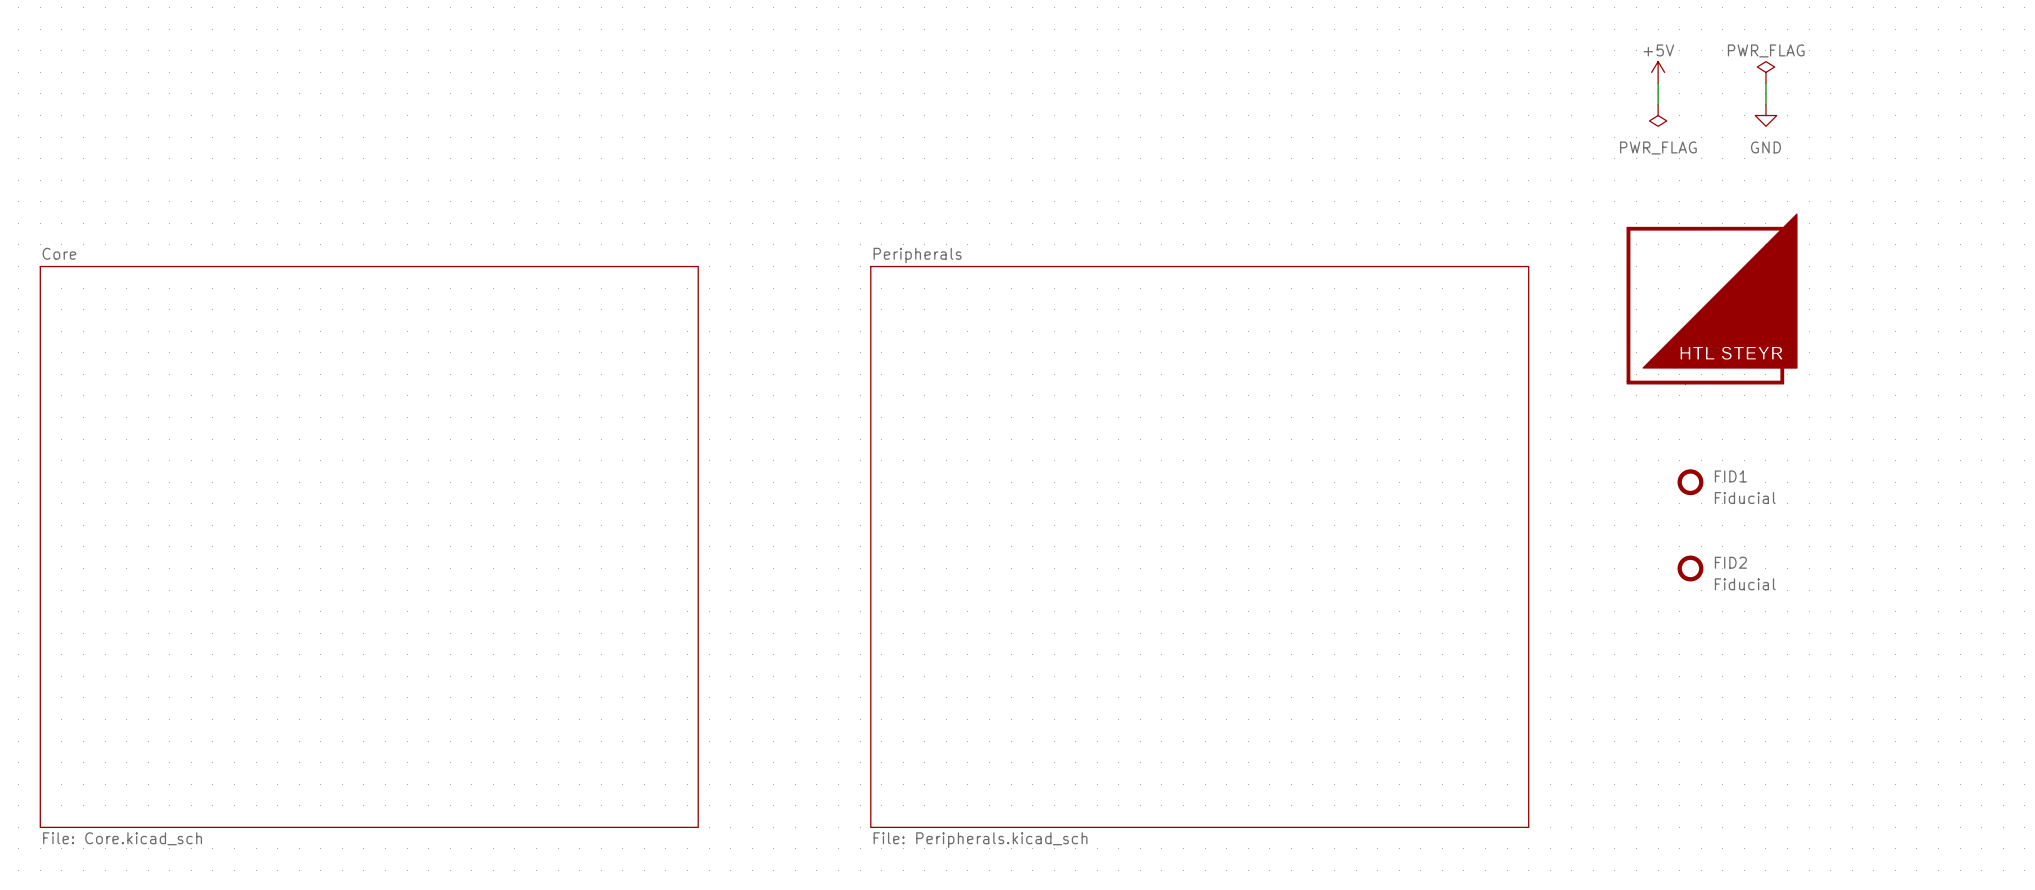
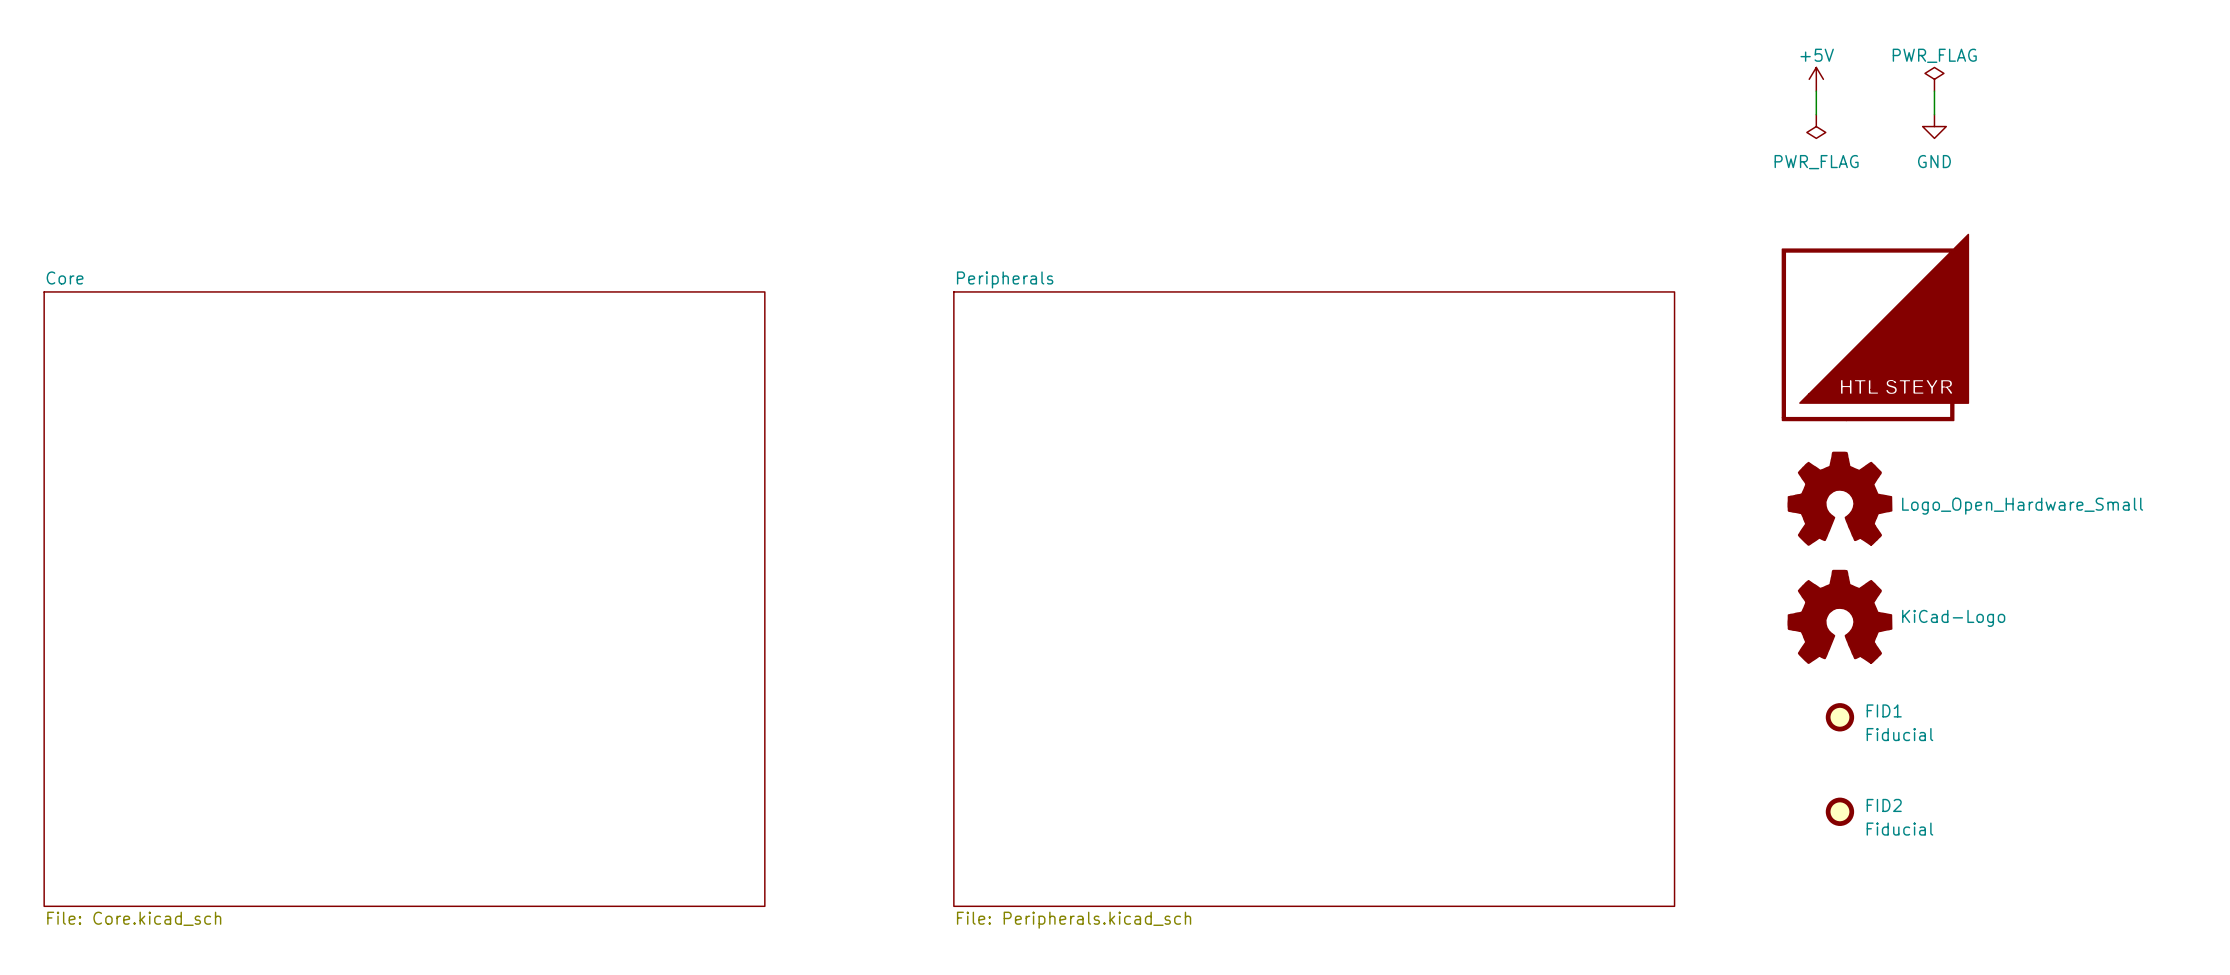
part: none -> Logo_Open_Hardware_Small (1839, 498)
FID1 position: (1690, 482) -> (1839, 717)
part: none -> KiCad-Logo (1839, 616)
FID2 position: (1690, 568) -> (1839, 811)

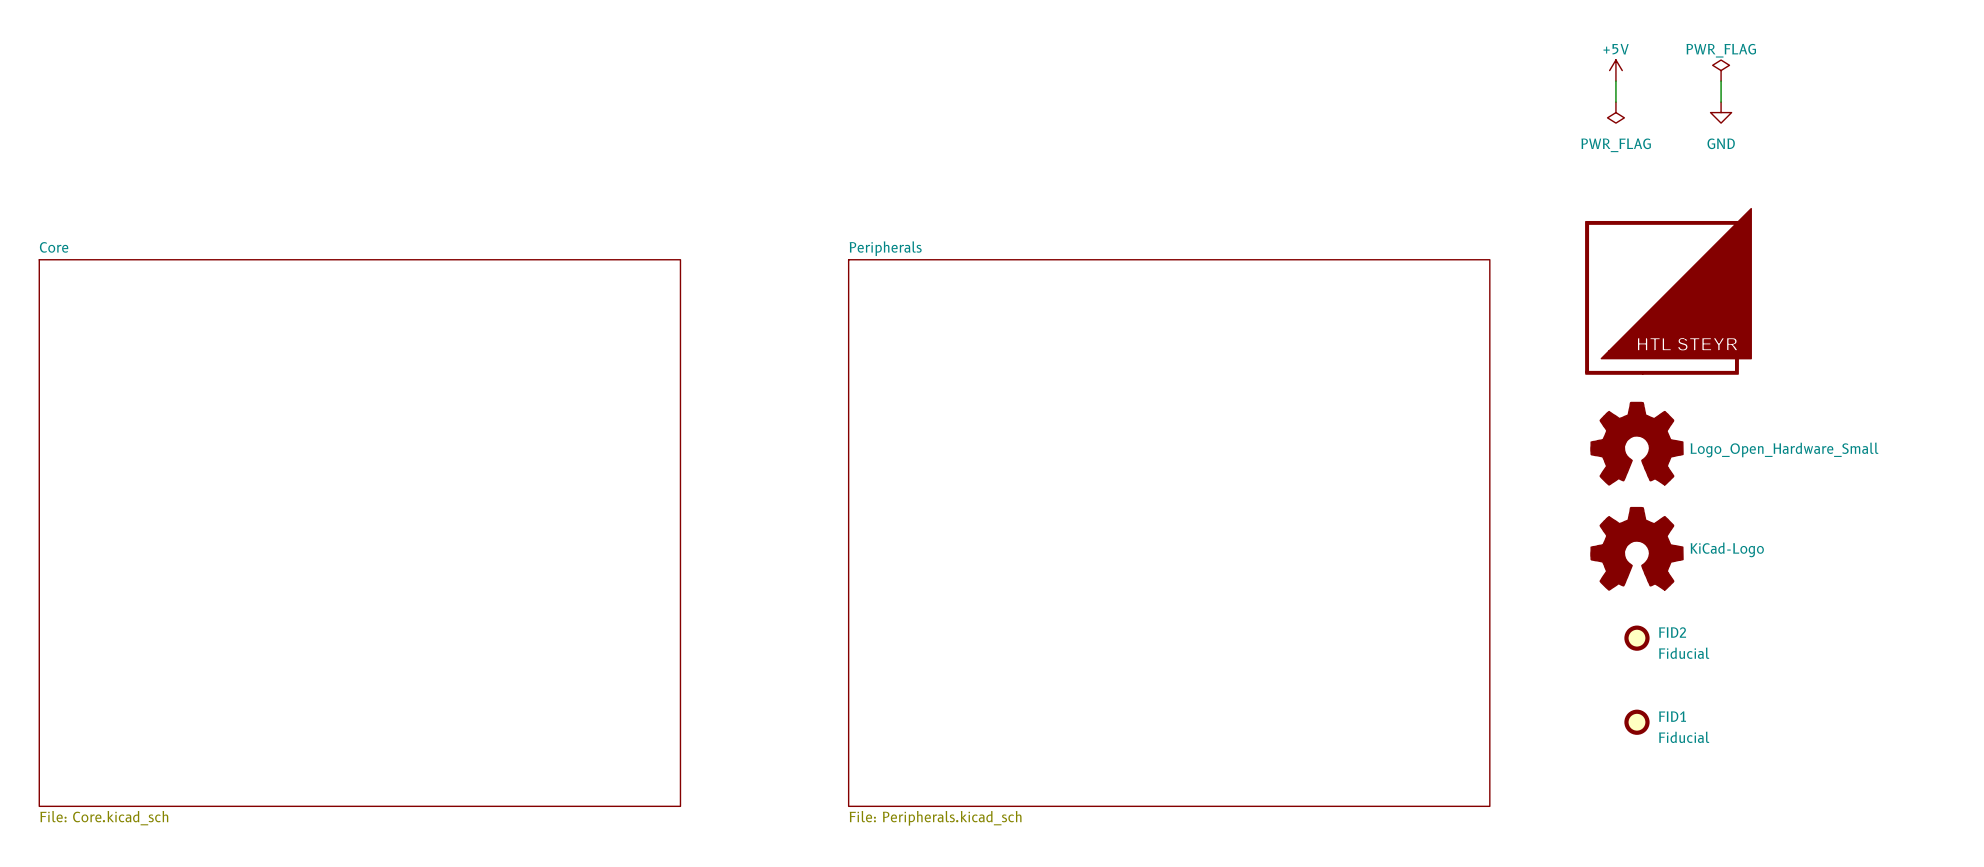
FID1 name: FID1 (1884, 710) -> FID2 (1672, 632)
FID2 name: FID2 (1884, 805) -> FID1 (1672, 716)

